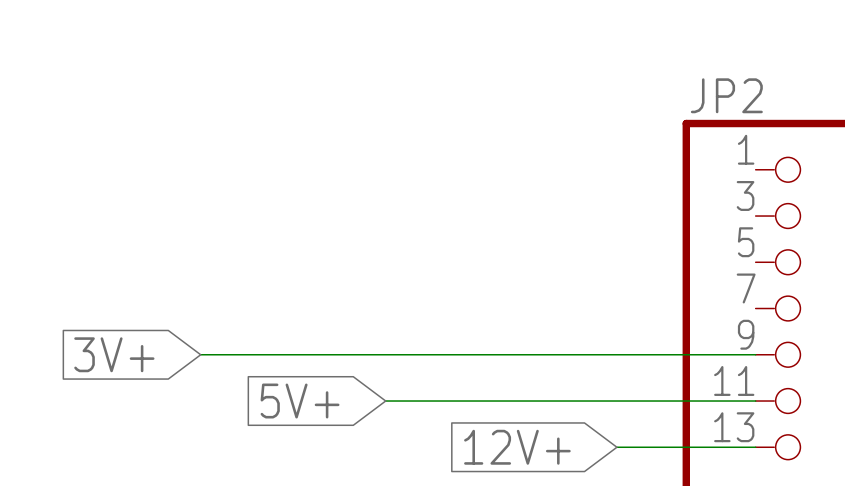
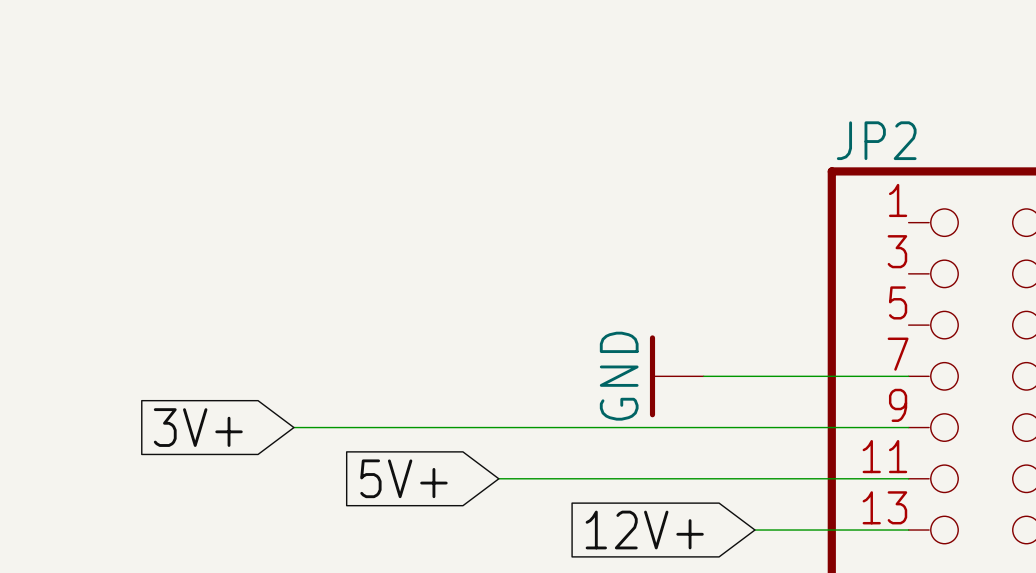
power symbol: none -> GND (676, 376)
wire: none -> (703, 376) (908, 376)

